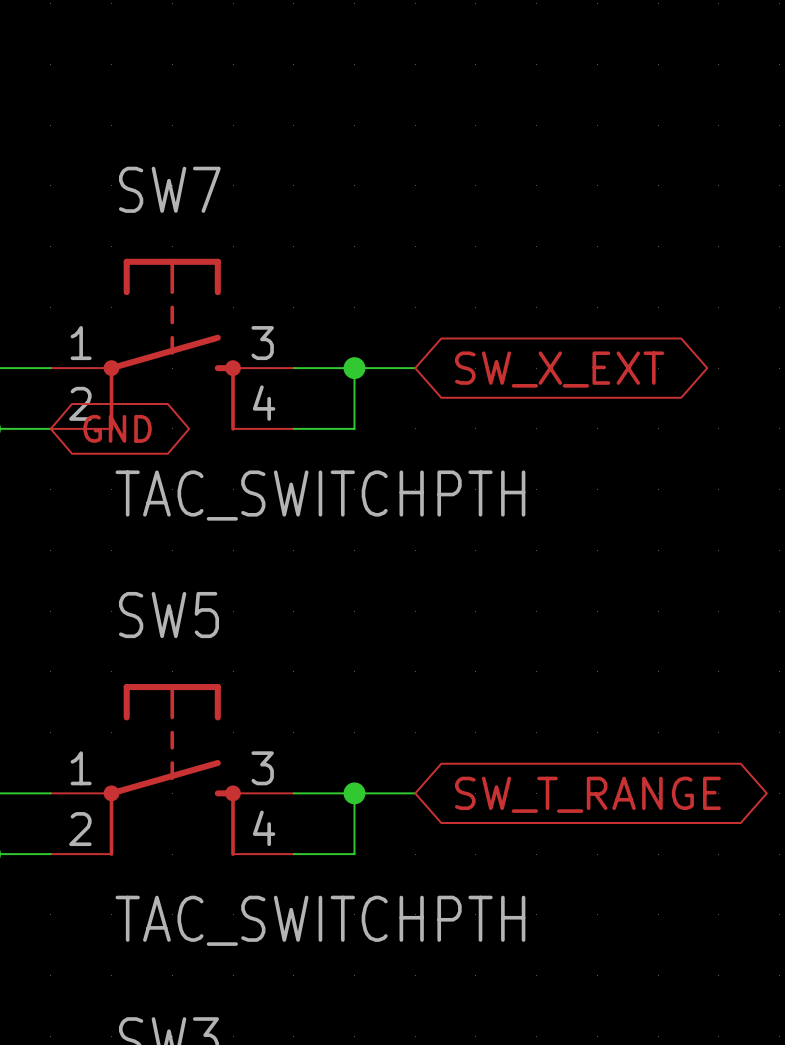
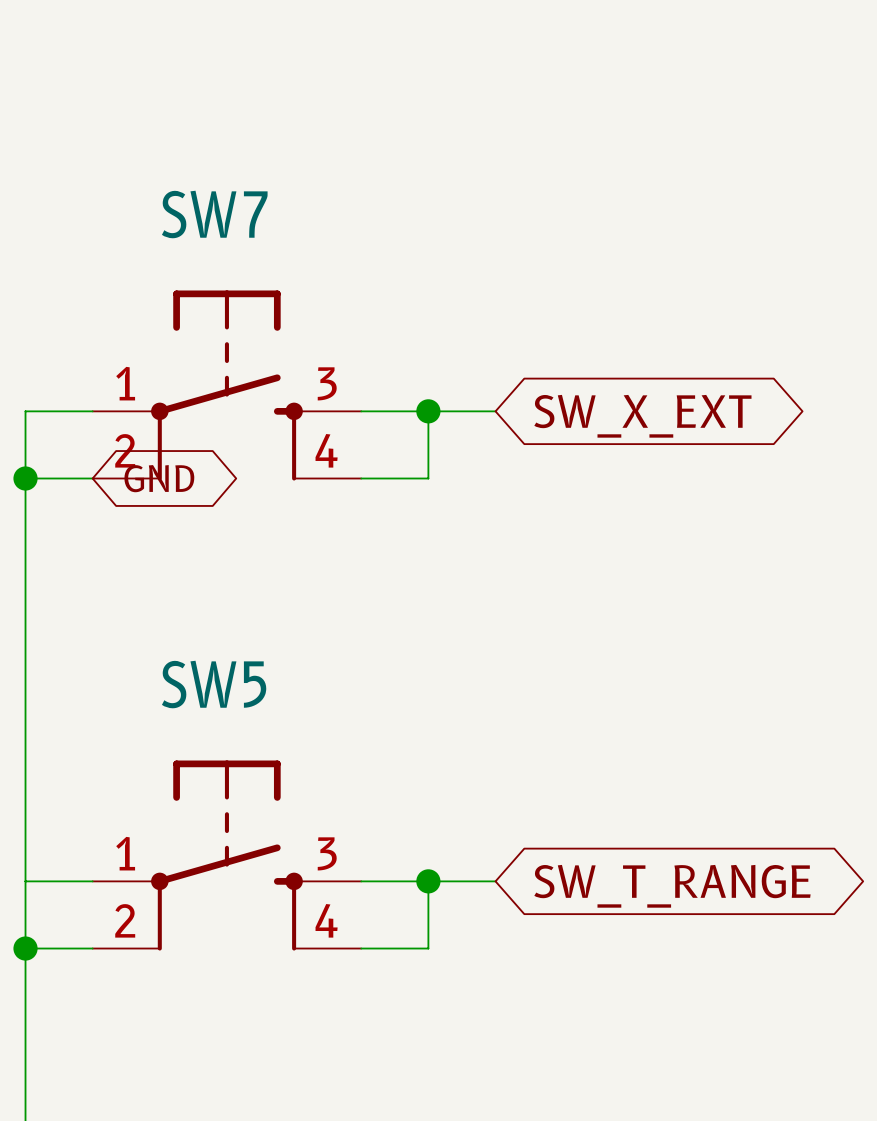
SW7 value: TAC_SWITCHPTH (320, 495) -> none
SW5 value: TAC_SWITCHPTH (320, 920) -> none

